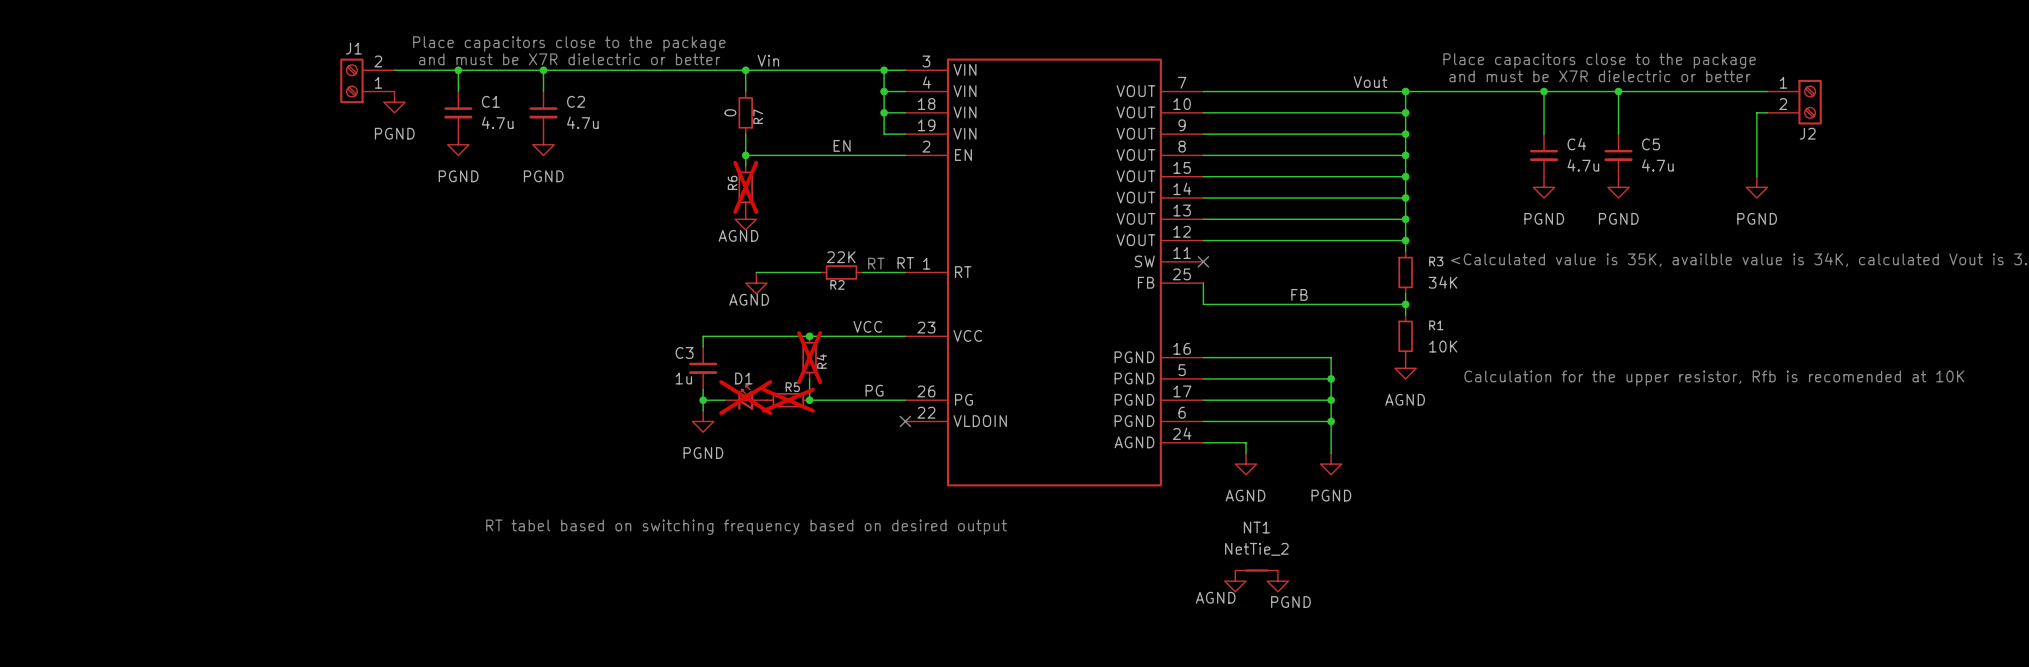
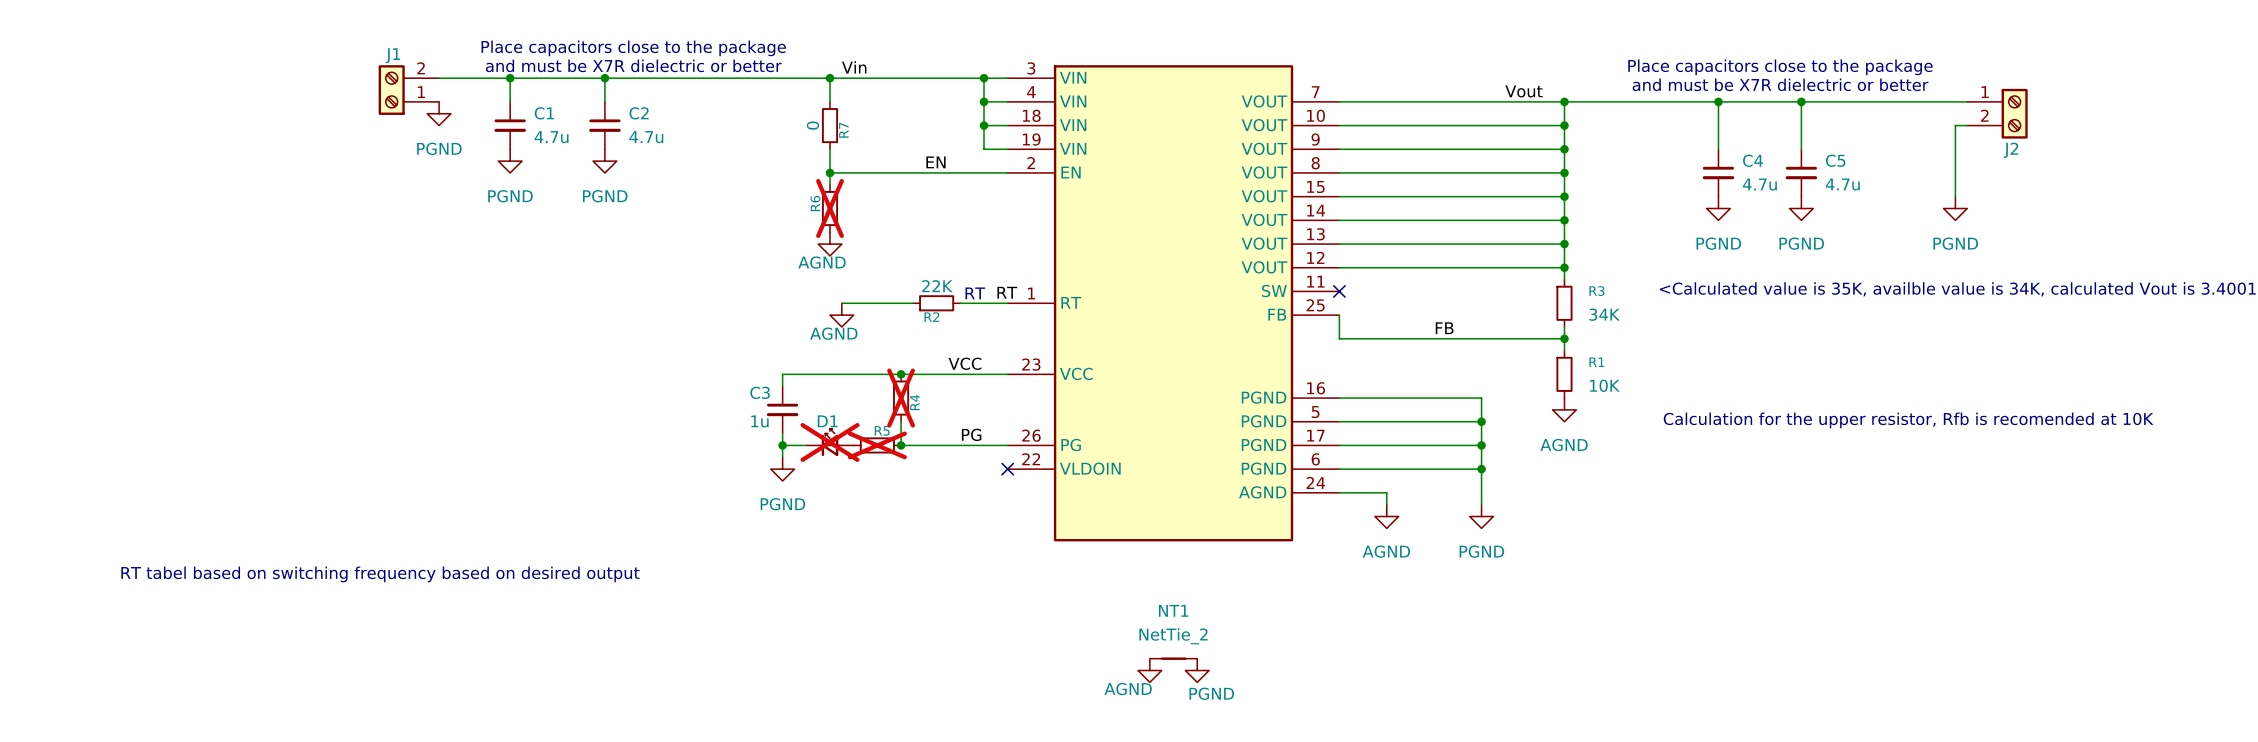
text: none -> RT tabel based on switching frequency based on desired output (380, 574)
text: RT tabel based on switching frequency based on desired output (746, 527) -> none
NT1 position: (1256, 570) -> (1173, 658)
power symbol position: AGND (1235, 581) -> AGND (1149, 670)
power symbol position: PGND (1277, 581) -> PGND (1197, 670)

